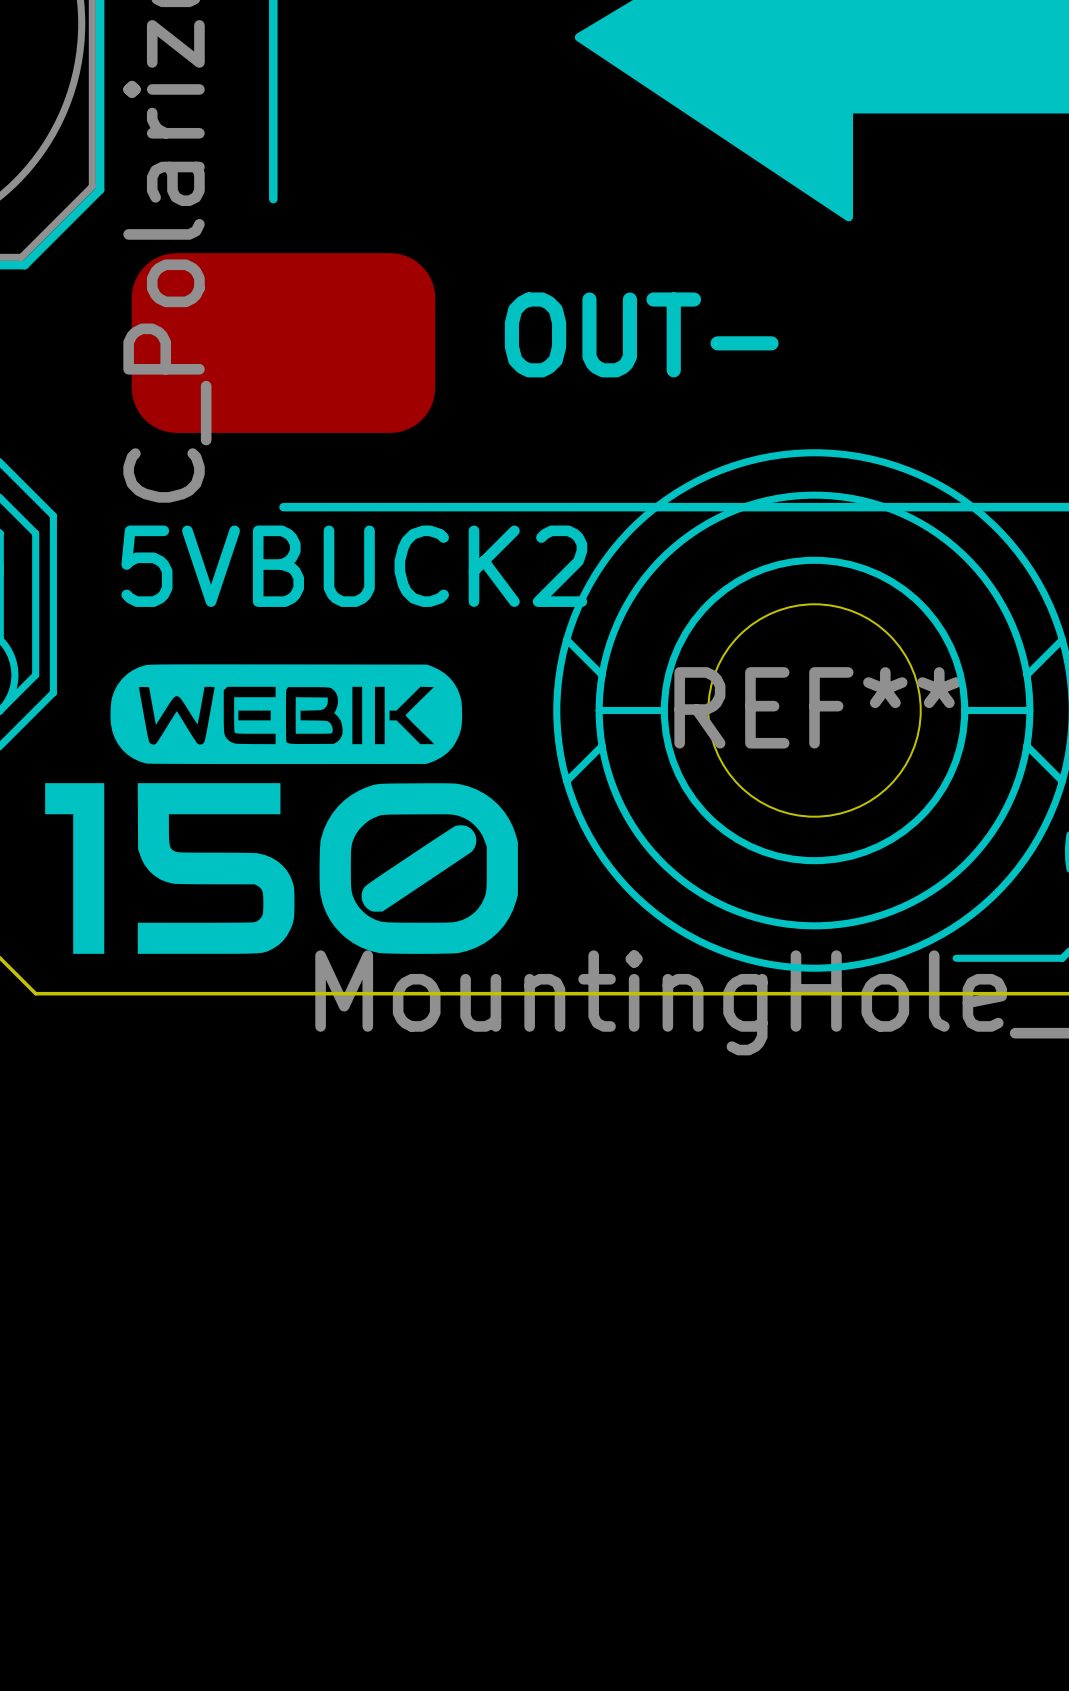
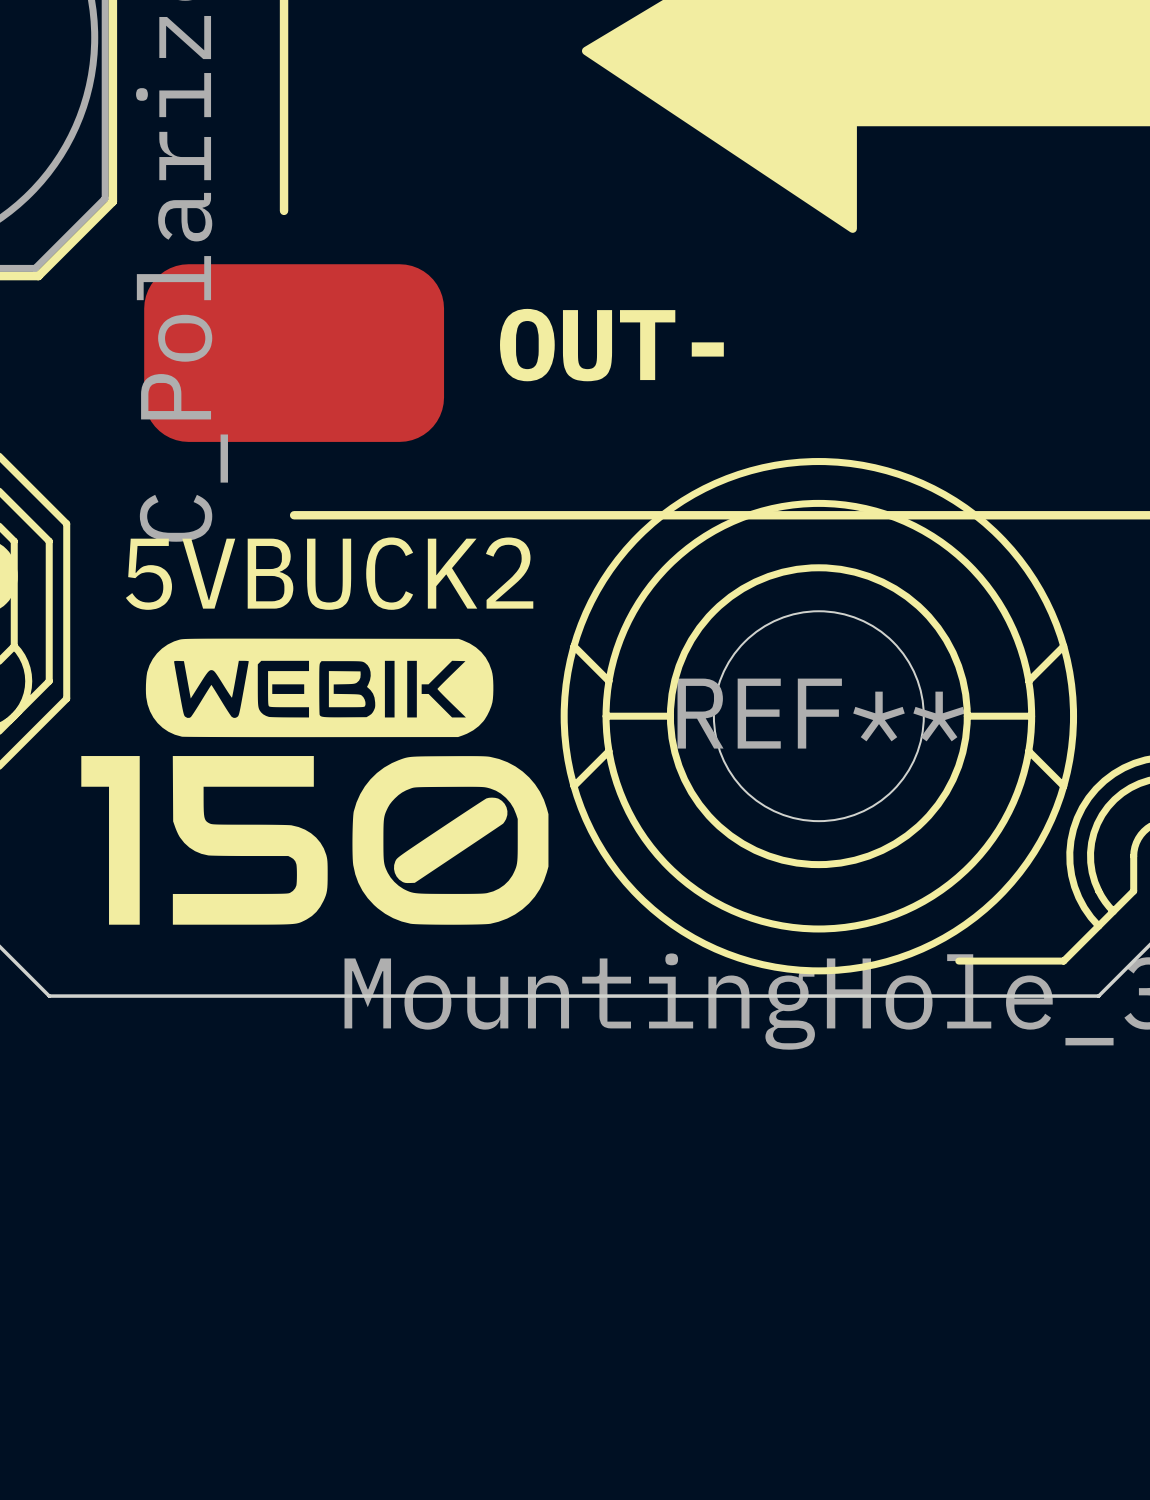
5VBUCK2 name position: 5VBUCK2 (354, 566) -> 5VBUCK2 (329, 573)
drawing position: (281, 809) -> (314, 781)

